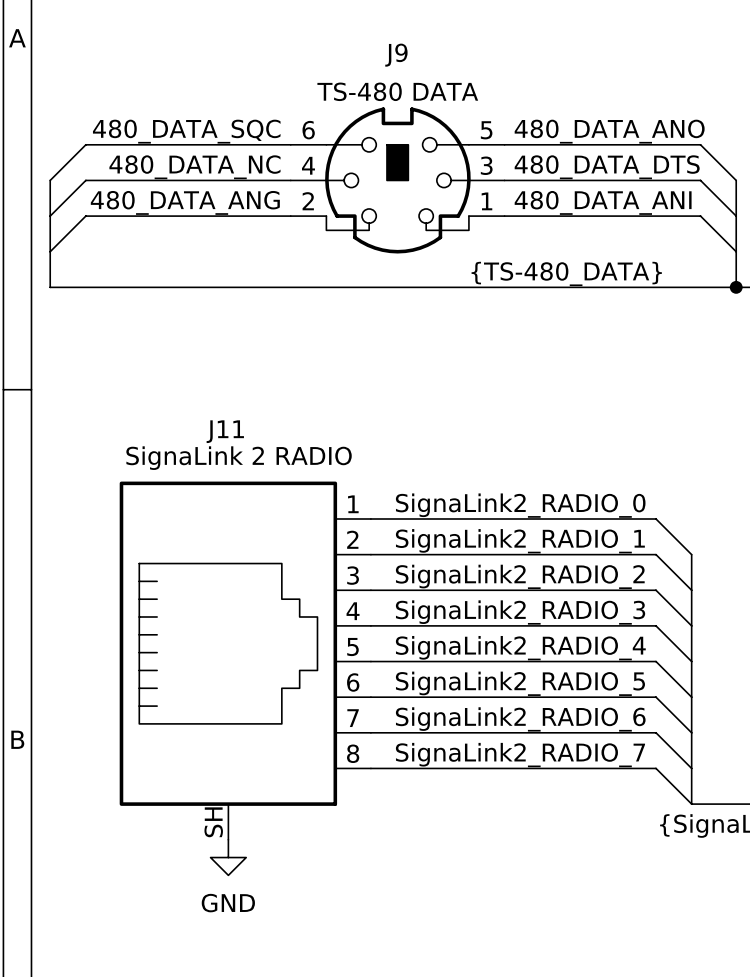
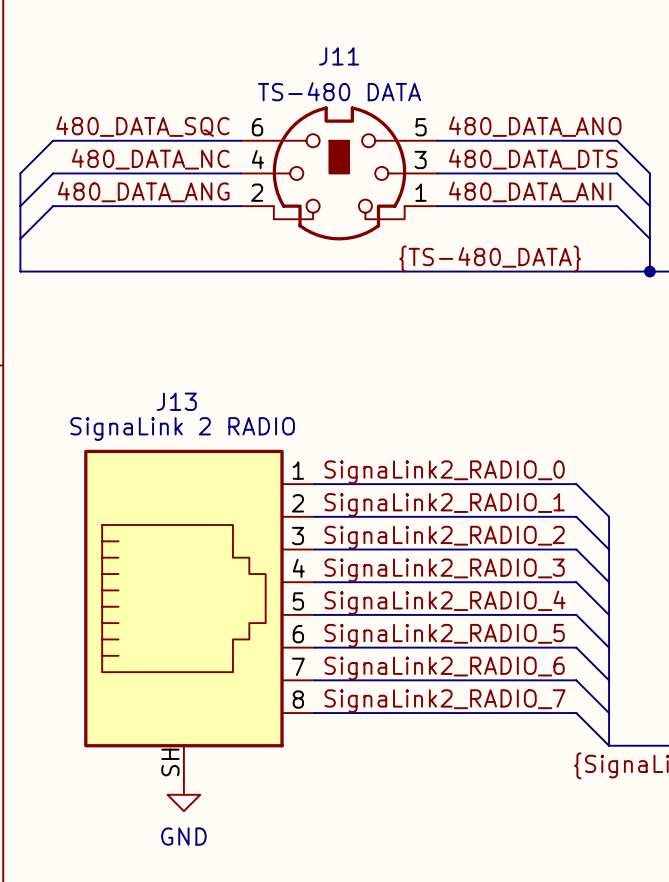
J9 name: J9 (396, 55) -> J11 (339, 56)
J11 name: J11 (225, 431) -> J13 (176, 401)

